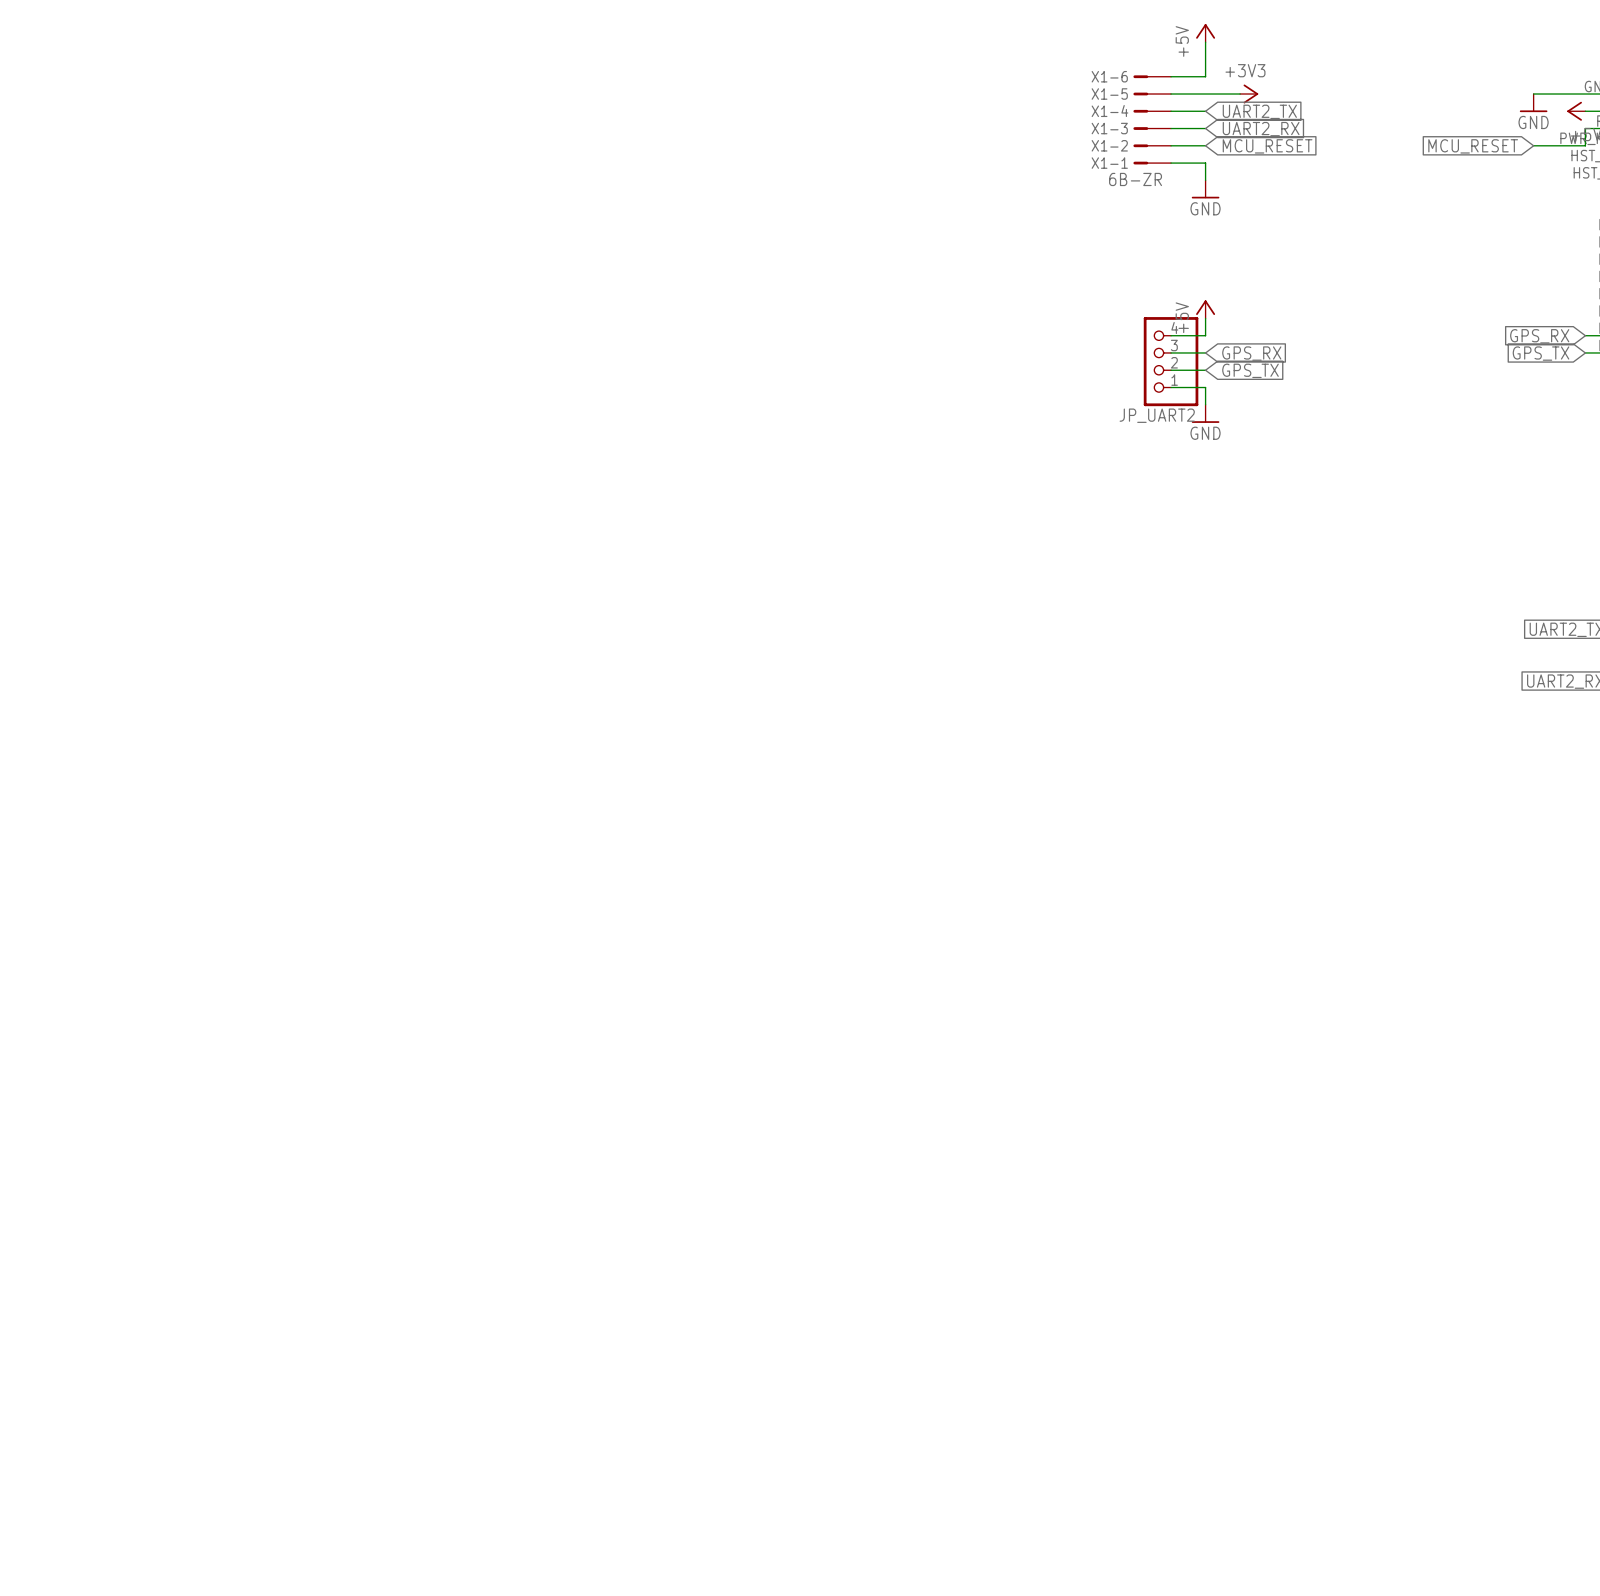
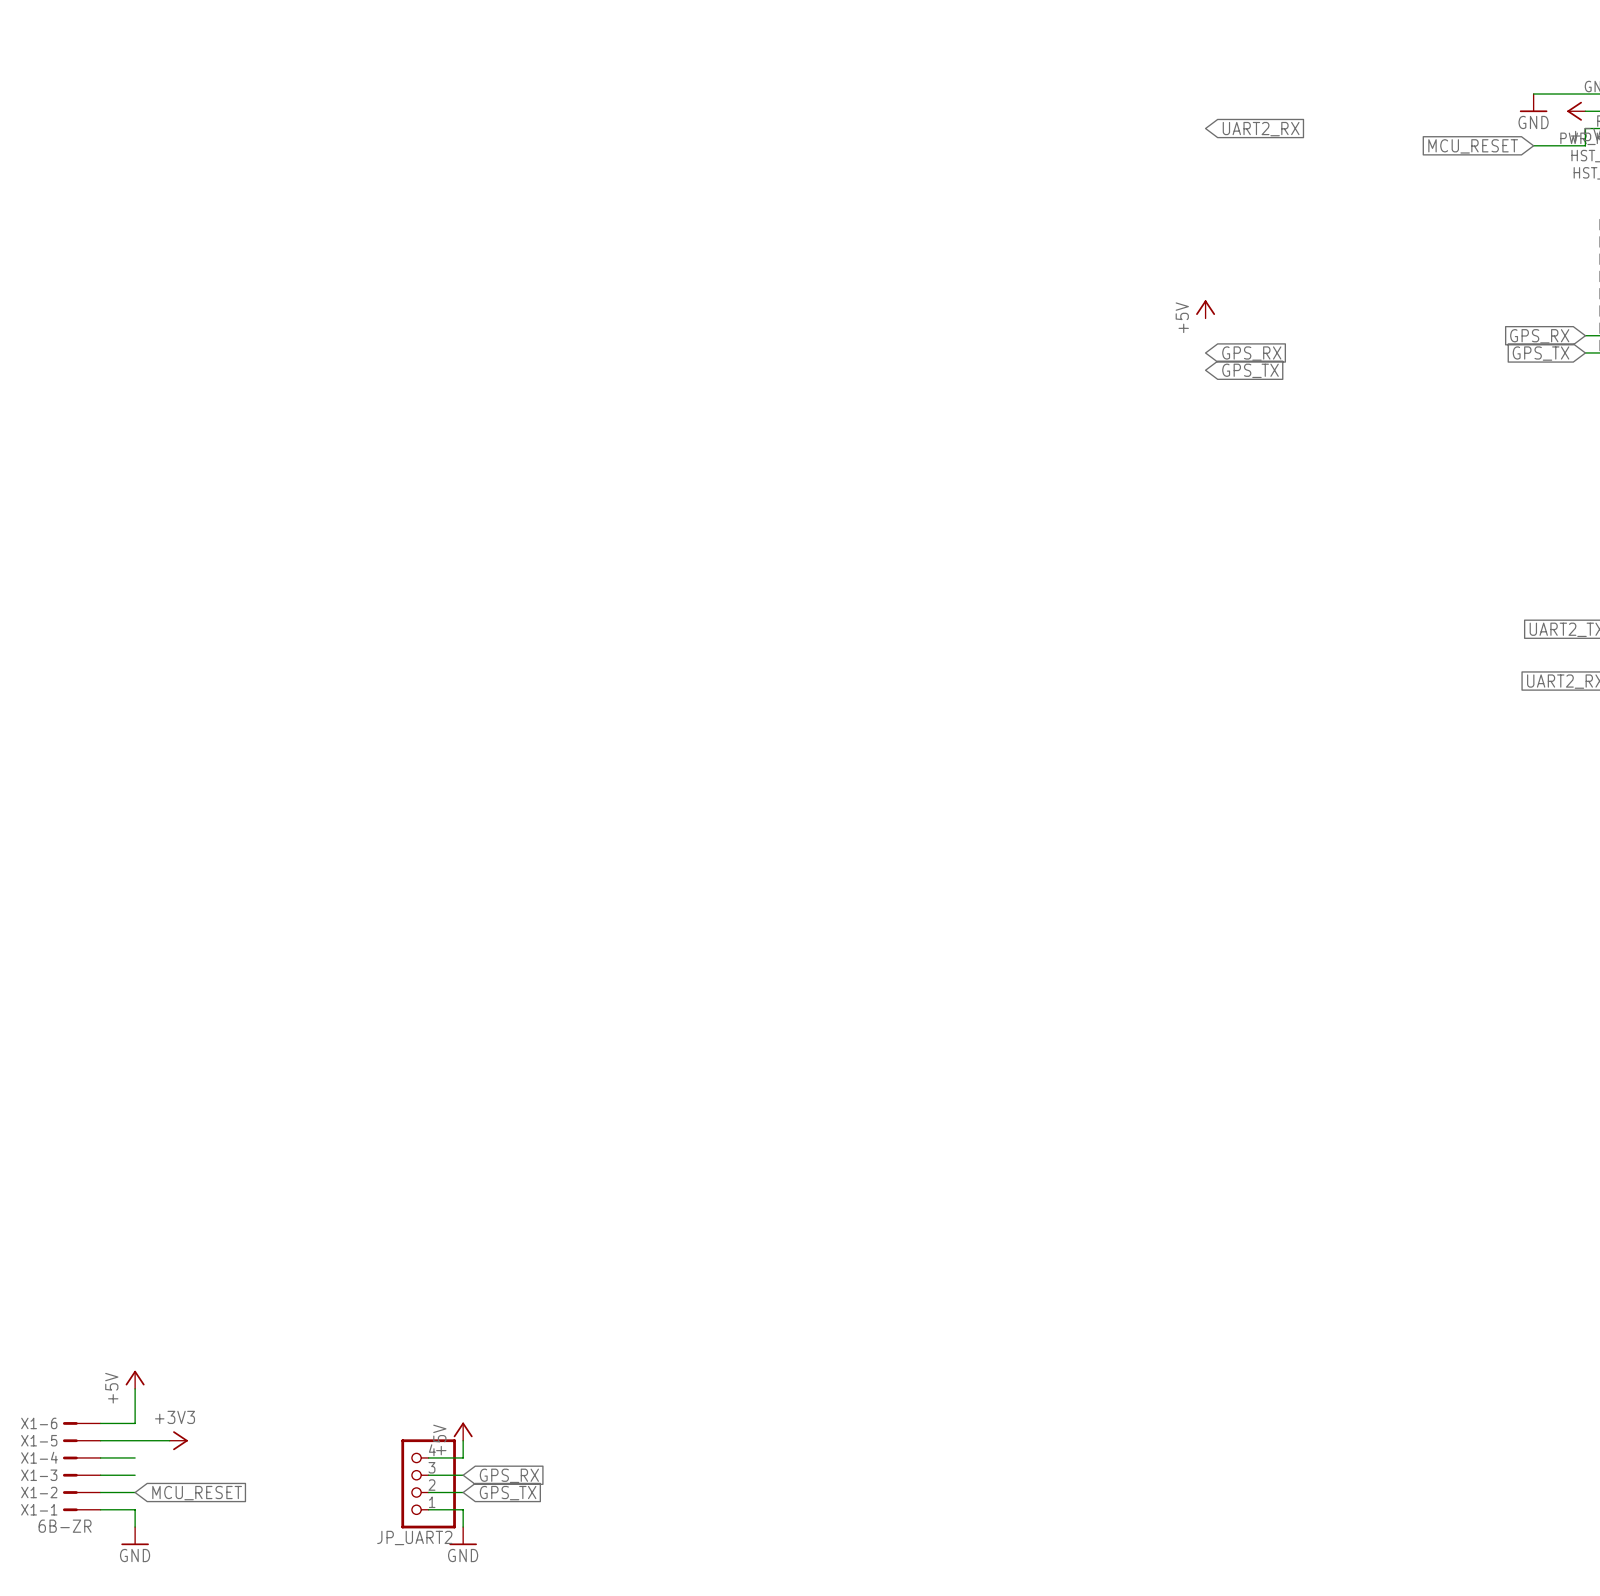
power symbol: +5V (1205, 33) -> none
wire: (1205, 42) (1205, 76) (1171, 76) -> none
X1-6 position: (1152, 76) -> (81, 1423)
X1-5 position: (1152, 94) -> (81, 1440)
wire: (1171, 94) (1240, 94) -> none
power symbol: +3V3 (1249, 94) -> none
X1-4 position: (1152, 111) -> (81, 1457)
wire: (1171, 111) (1205, 111) -> none
global label: UART2_TX (1259, 111) -> none
X1-3 position: (1152, 128) -> (81, 1475)
wire: (1171, 128) (1205, 128) -> none
X1-2 position: (1152, 145) -> (81, 1492)
wire: (1171, 145) (1205, 145) -> none
global label: MCU_RESET (1267, 146) -> none
X1-1 position: (1152, 163) -> (81, 1509)
wire: (1171, 163) (1205, 163) (1205, 180) -> none
power symbol: GND (1205, 189) -> none
wire: (1205, 318) (1205, 335) (1171, 335) -> none
wire: (1171, 352) (1205, 352) -> none
JP_UART2 position: (1171, 361) -> (428, 1483)
wire: (1171, 370) (1205, 370) -> none
wire: (1171, 387) (1205, 387) (1205, 404) -> none
power symbol: GND (1205, 413) -> none
power symbol: none -> +5V (135, 1379)
wire: none -> (135, 1388) (135, 1423) (100, 1423)
power symbol: none -> +5V (463, 1431)
wire: none -> (100, 1440) (169, 1440)
power symbol: none -> +3V3 (178, 1440)
wire: none -> (463, 1440) (463, 1457) (428, 1457)
wire: none -> (100, 1457) (135, 1457)
wire: none -> (100, 1475) (135, 1475)
wire: none -> (428, 1475) (463, 1475)
global label: none -> GPS_RX (509, 1475)
wire: none -> (100, 1492) (135, 1492)
wire: none -> (428, 1492) (463, 1492)
global label: none -> MCU_RESET (197, 1493)
global label: none -> GPS_TX (508, 1493)
wire: none -> (100, 1509) (135, 1509) (135, 1527)
wire: none -> (428, 1509) (463, 1509) (463, 1527)
power symbol: none -> GND (135, 1536)
power symbol: none -> GND (463, 1536)

